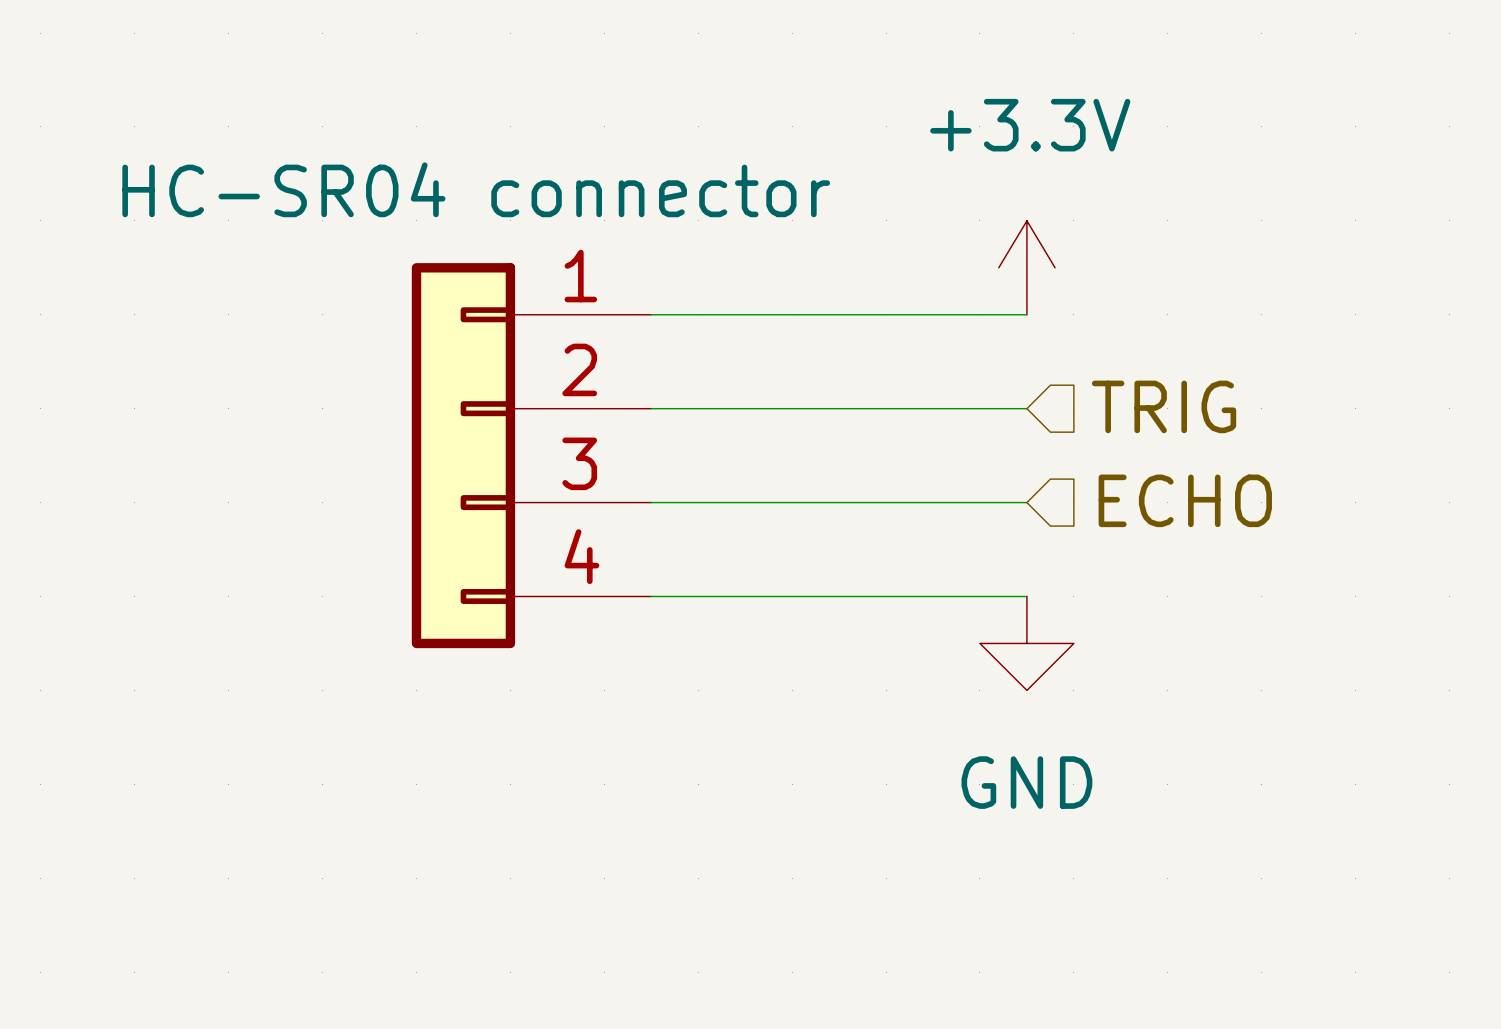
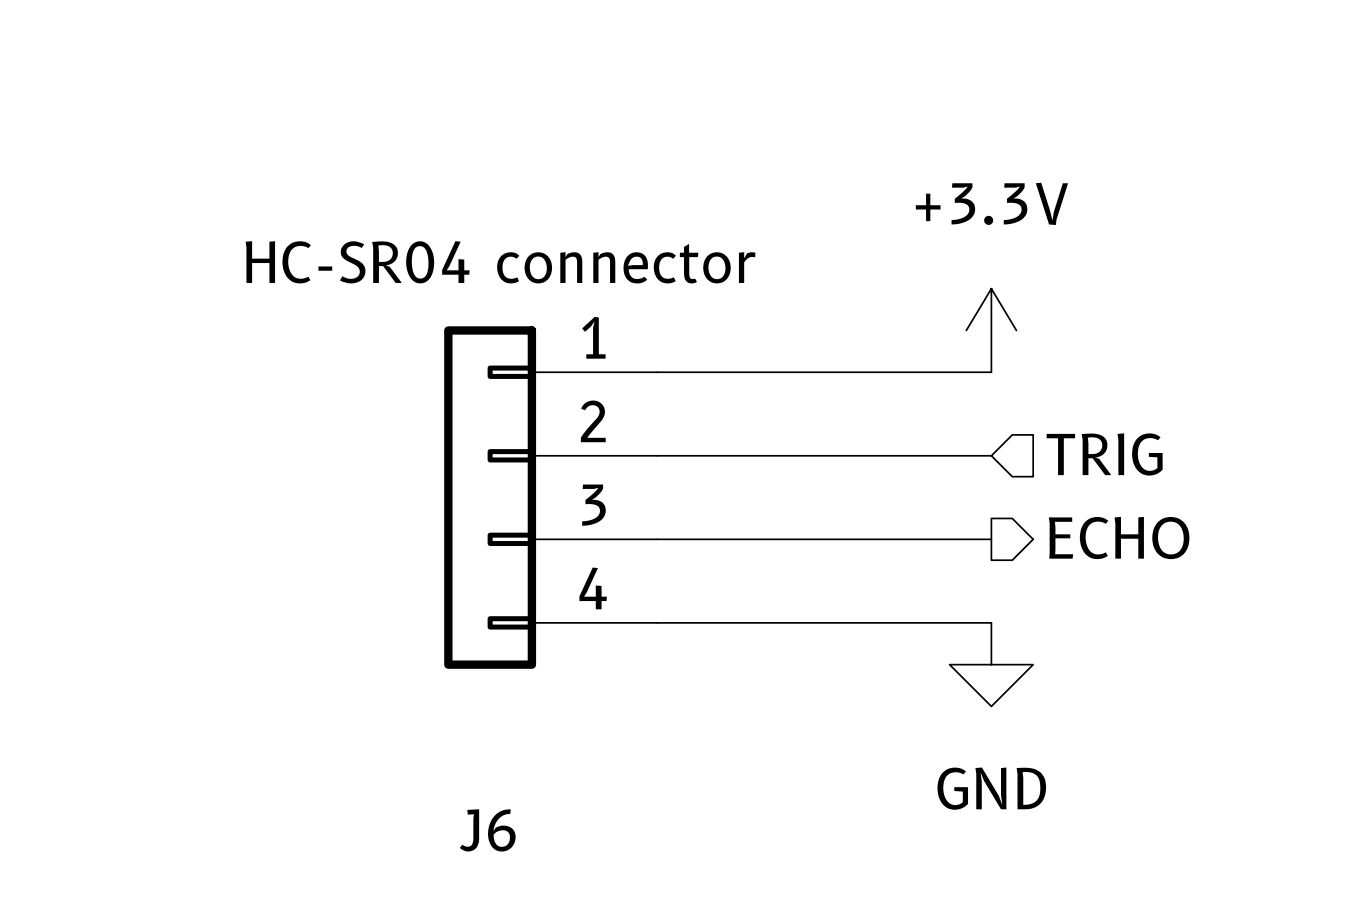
hierarchical label shape: input (1185, 500) -> output (1119, 538)
J6 name: none -> J6 (487, 830)

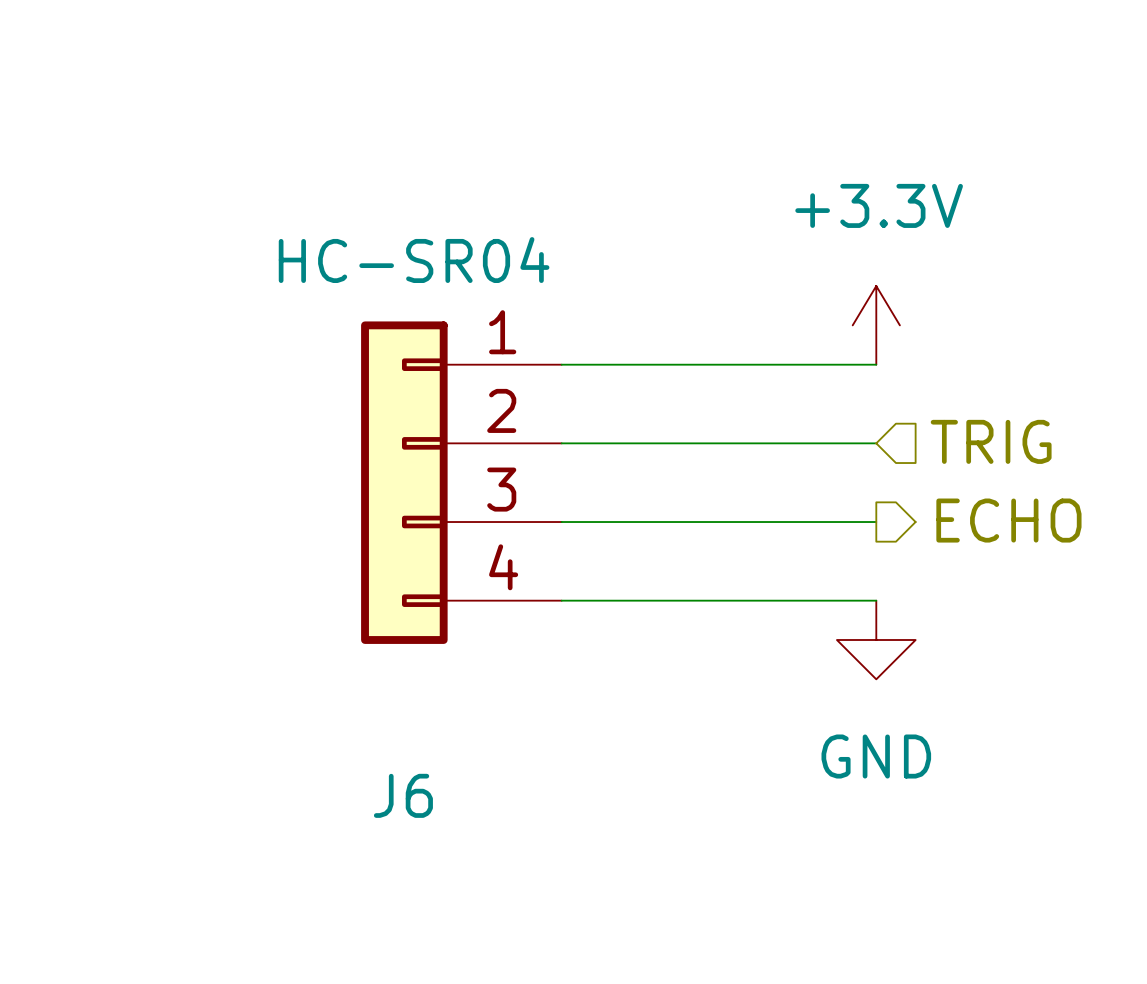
J6 value: HC-SR04 connector (500, 262) -> HC-SR04 (414, 260)

